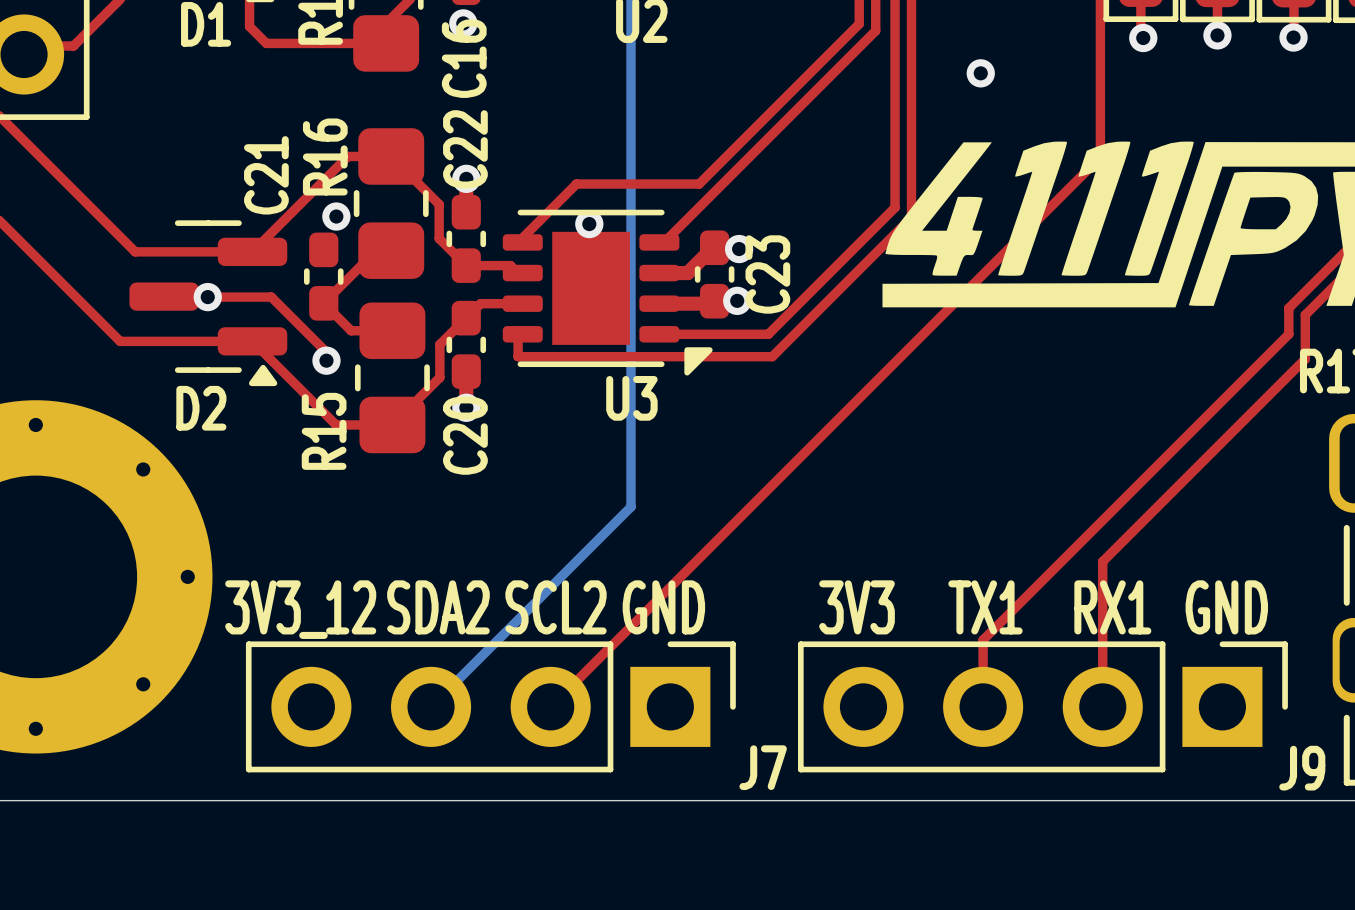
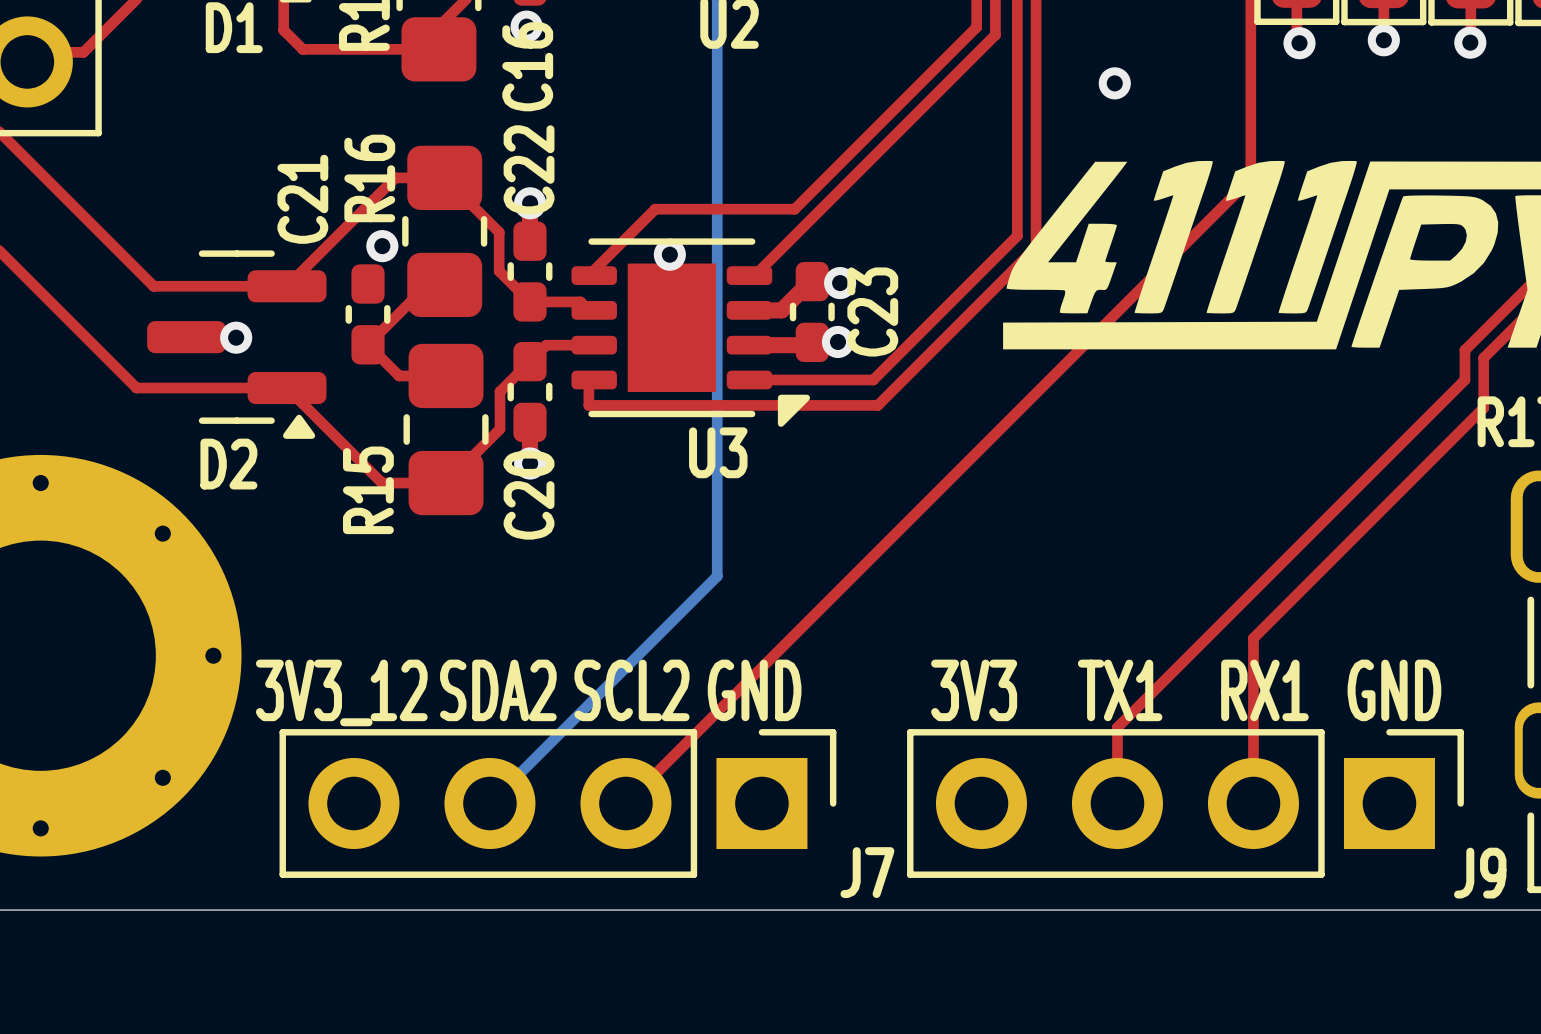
top track: (207, 297) (271, 297) (326, 352) (326, 360) -> none
via: (326, 360) -> none

